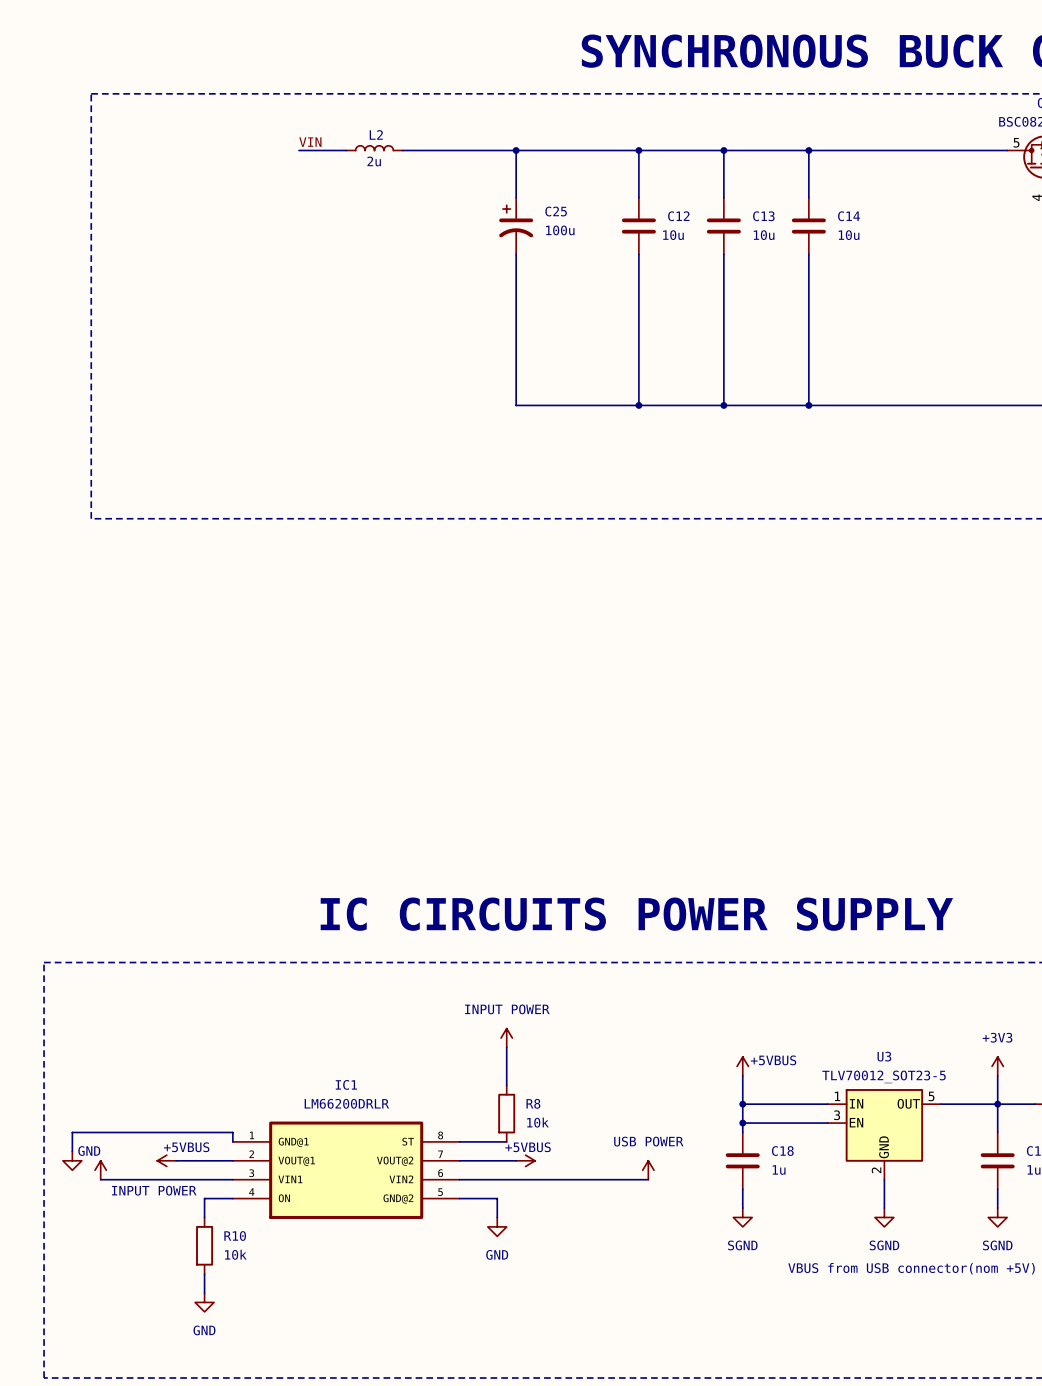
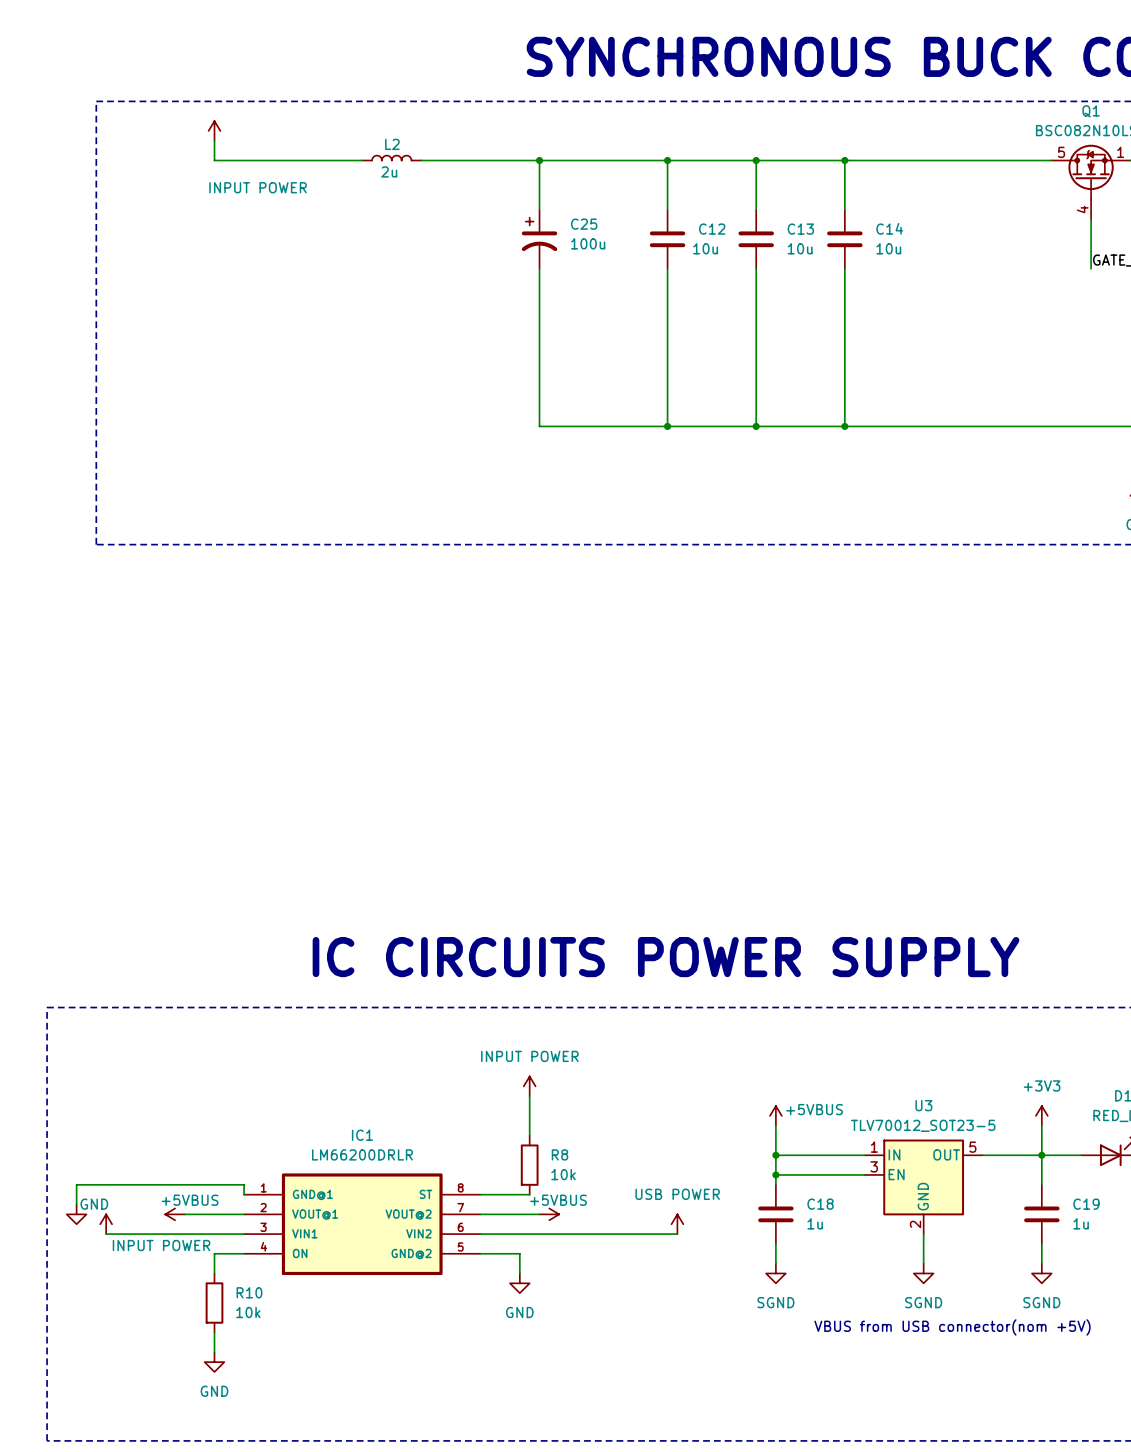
power symbol: none -> INPUT POWER (214, 130)
wire: none -> (214, 140) (214, 160) (312, 160)
label: VIN (310, 142) -> none

